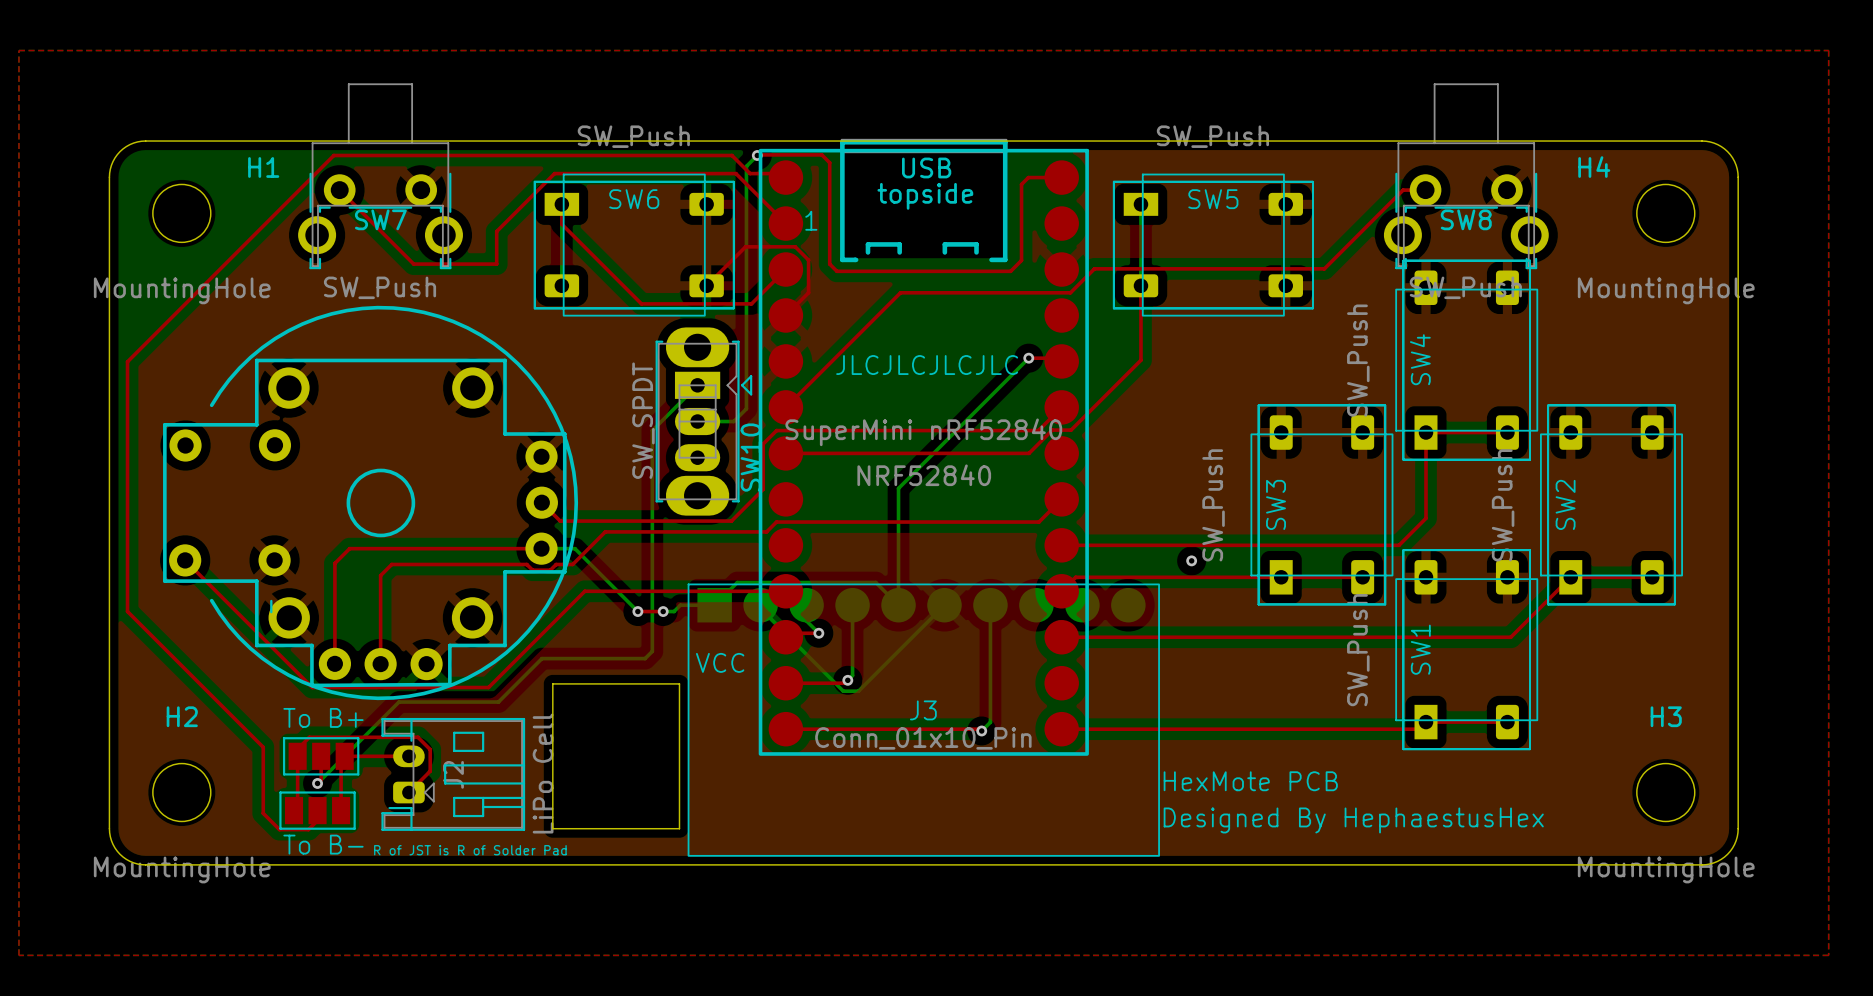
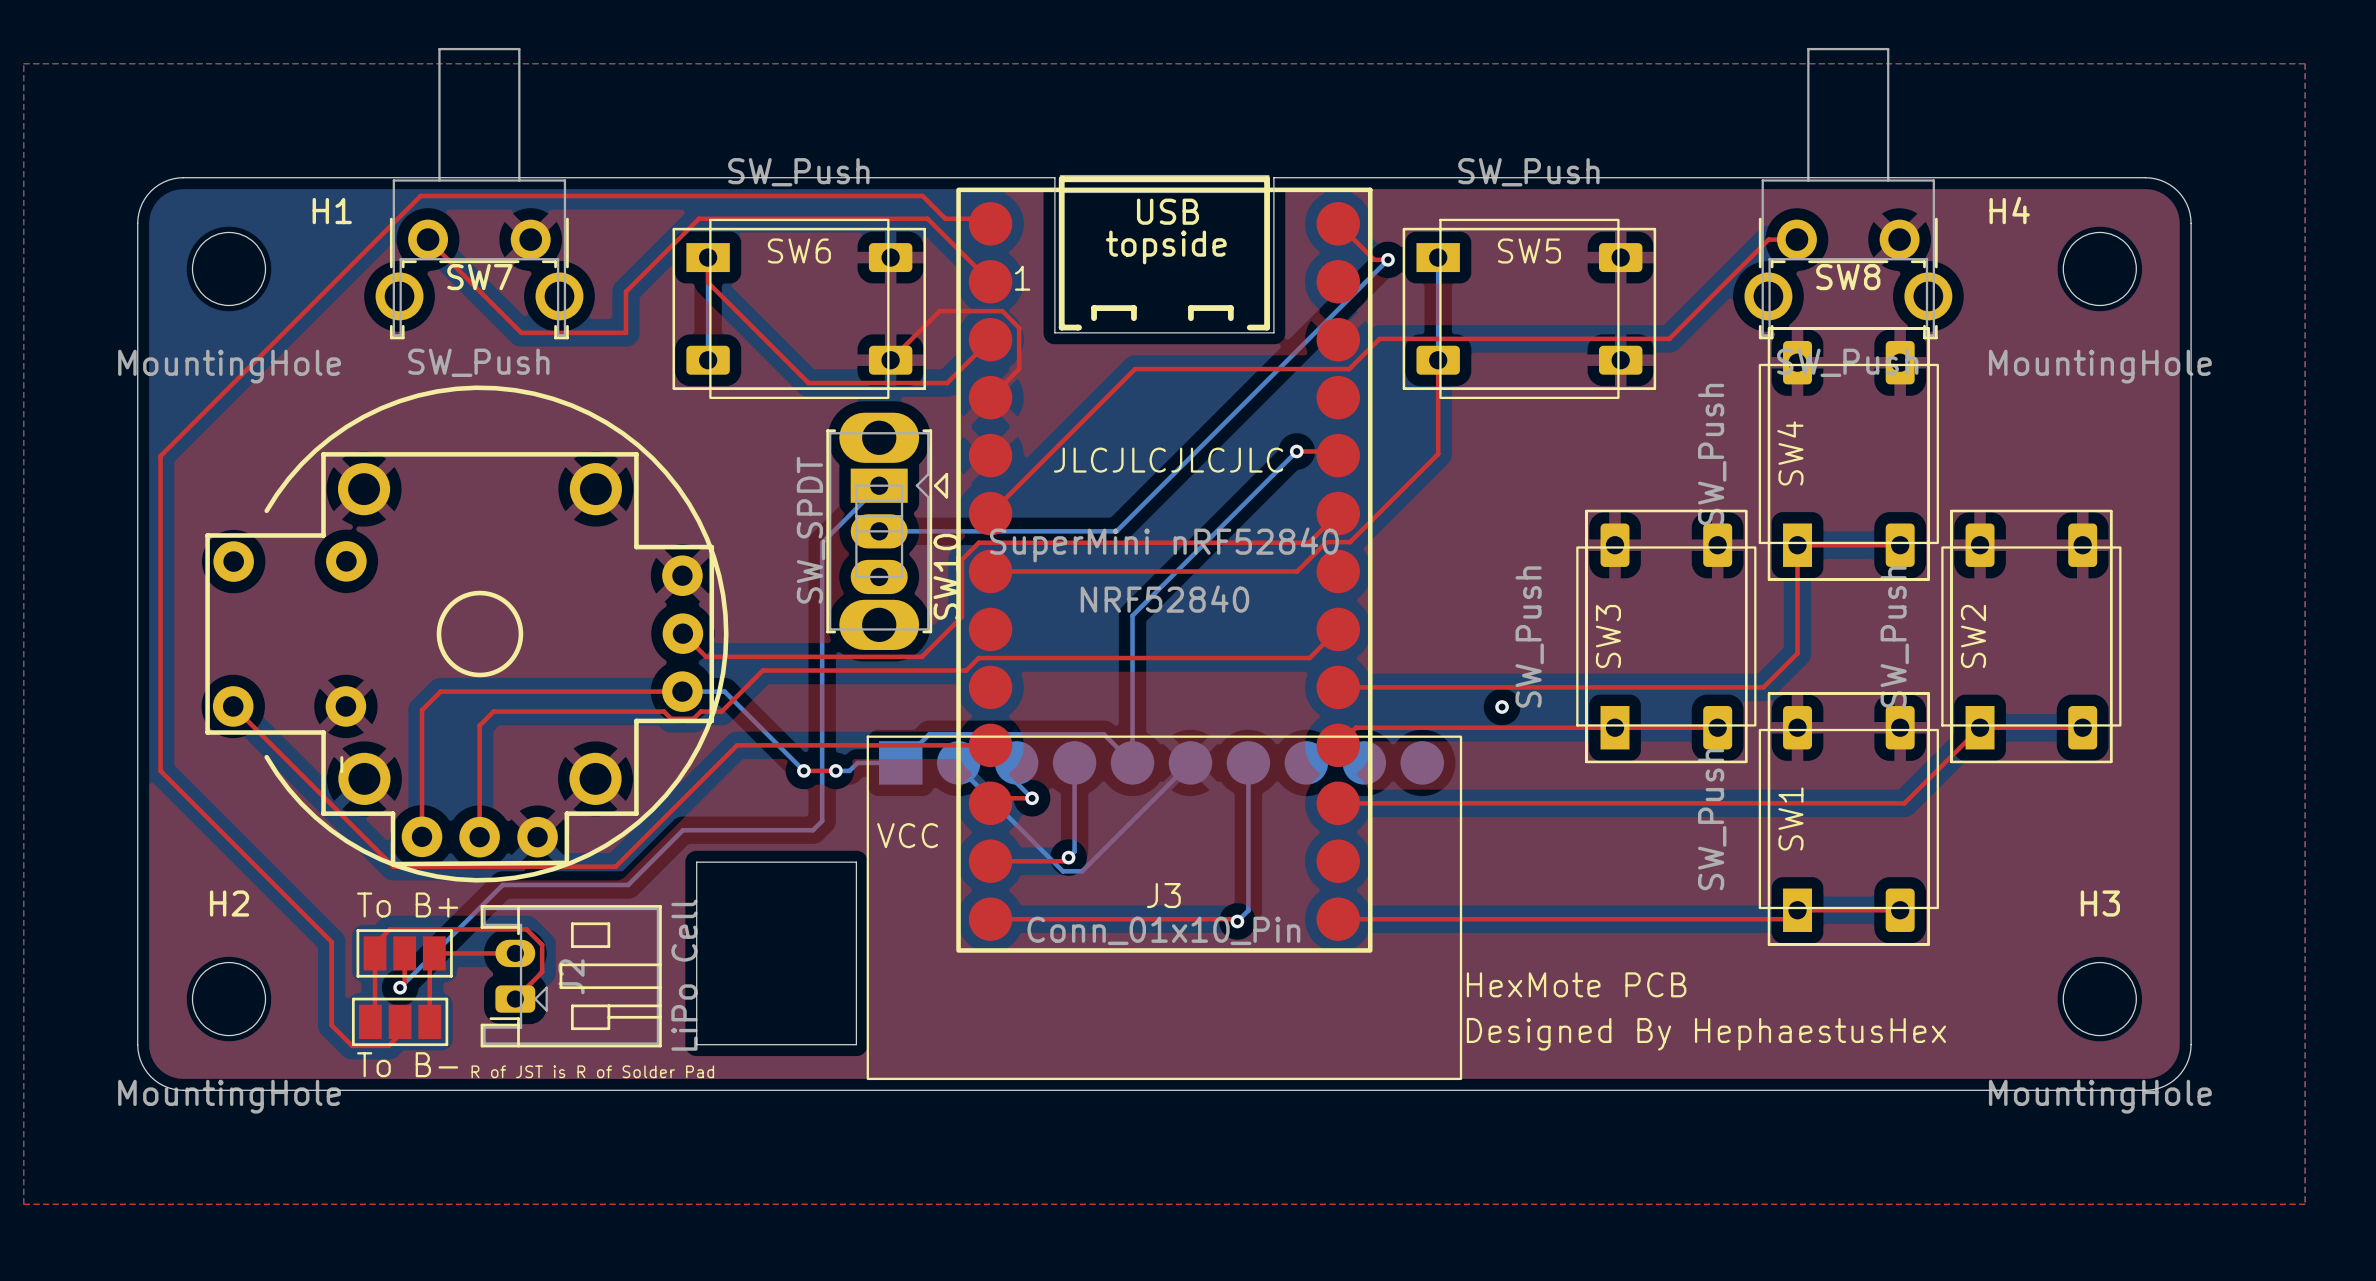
SW7 footprint: [298, 83, 463, 270] -> [375, 47, 584, 340]
SW8 footprint: [1383, 83, 1549, 270] -> [1744, 47, 1953, 340]
board edge: (836, 141) (1010, 141) -> (1054, 177) (1054, 332) (1273, 332) (1273, 177)
top track: (757, 155) (821, 154) (829, 162) (829, 264) (836, 271) (1010, 271) (1021, 260) (1021, 184) (1028, 177) (1061, 177) -> (1387, 259) (1374, 259) (1338, 223)
bottom track: (757, 155) (746, 166) (746, 408) (733, 421) -> (1387, 259) (1116, 531) (924, 531)
via: (757, 155) -> none
via: none -> (1387, 259)

